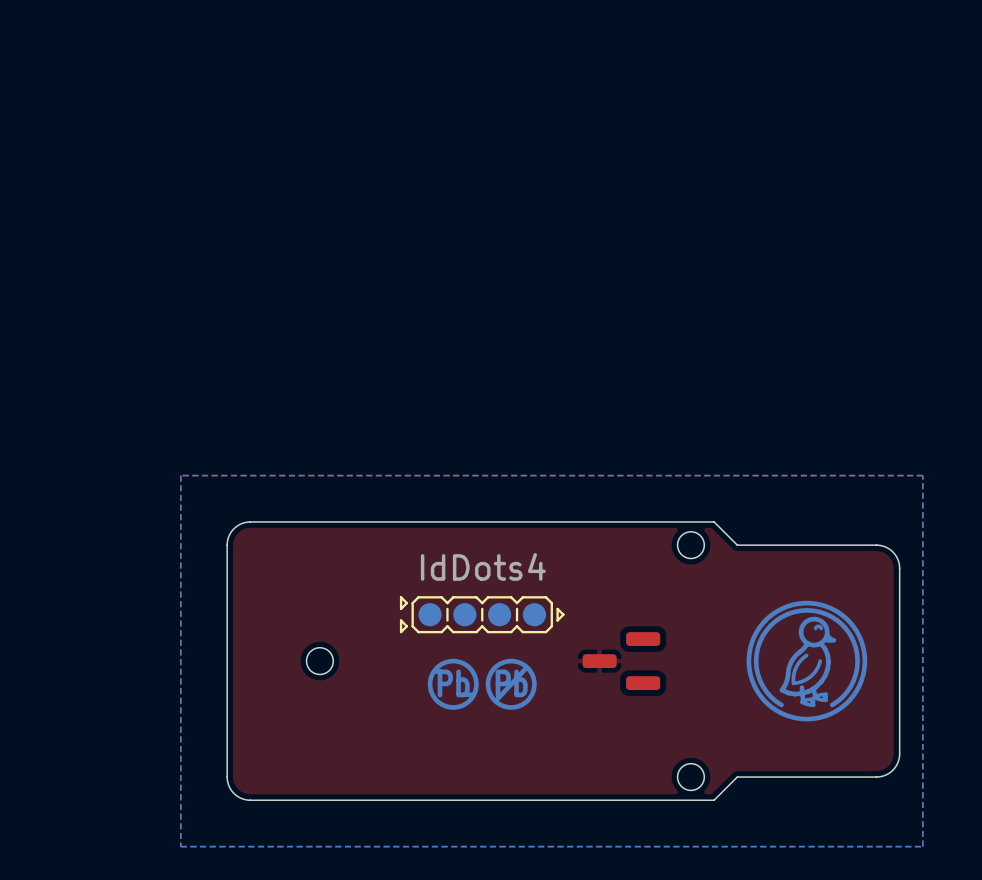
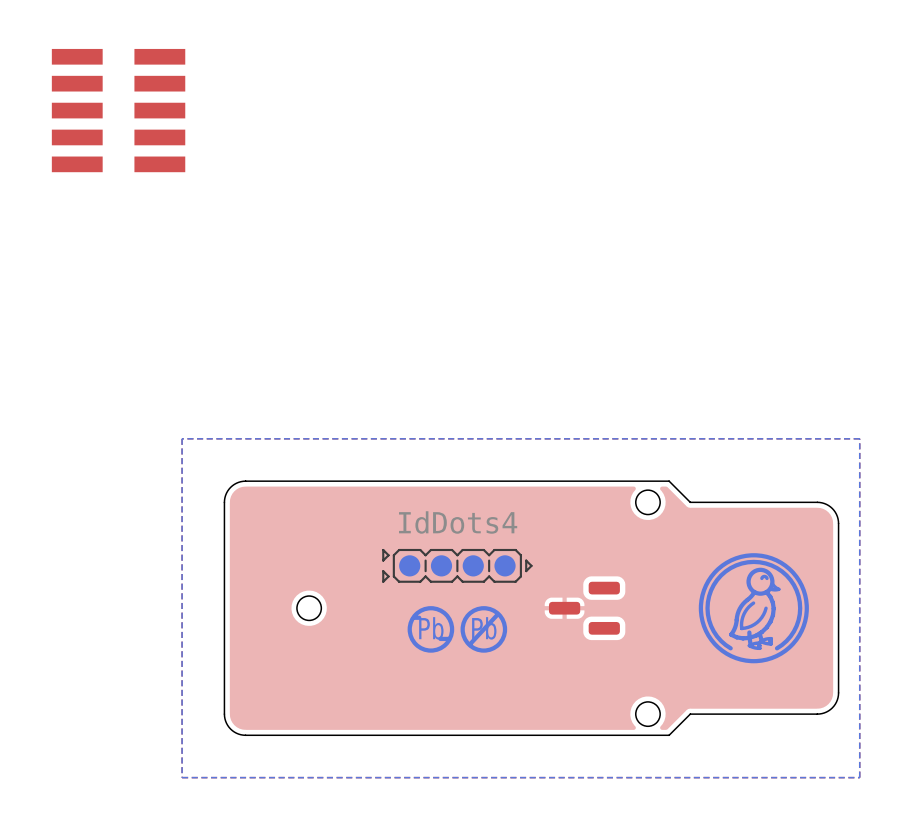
part: none -> (118, 110)

